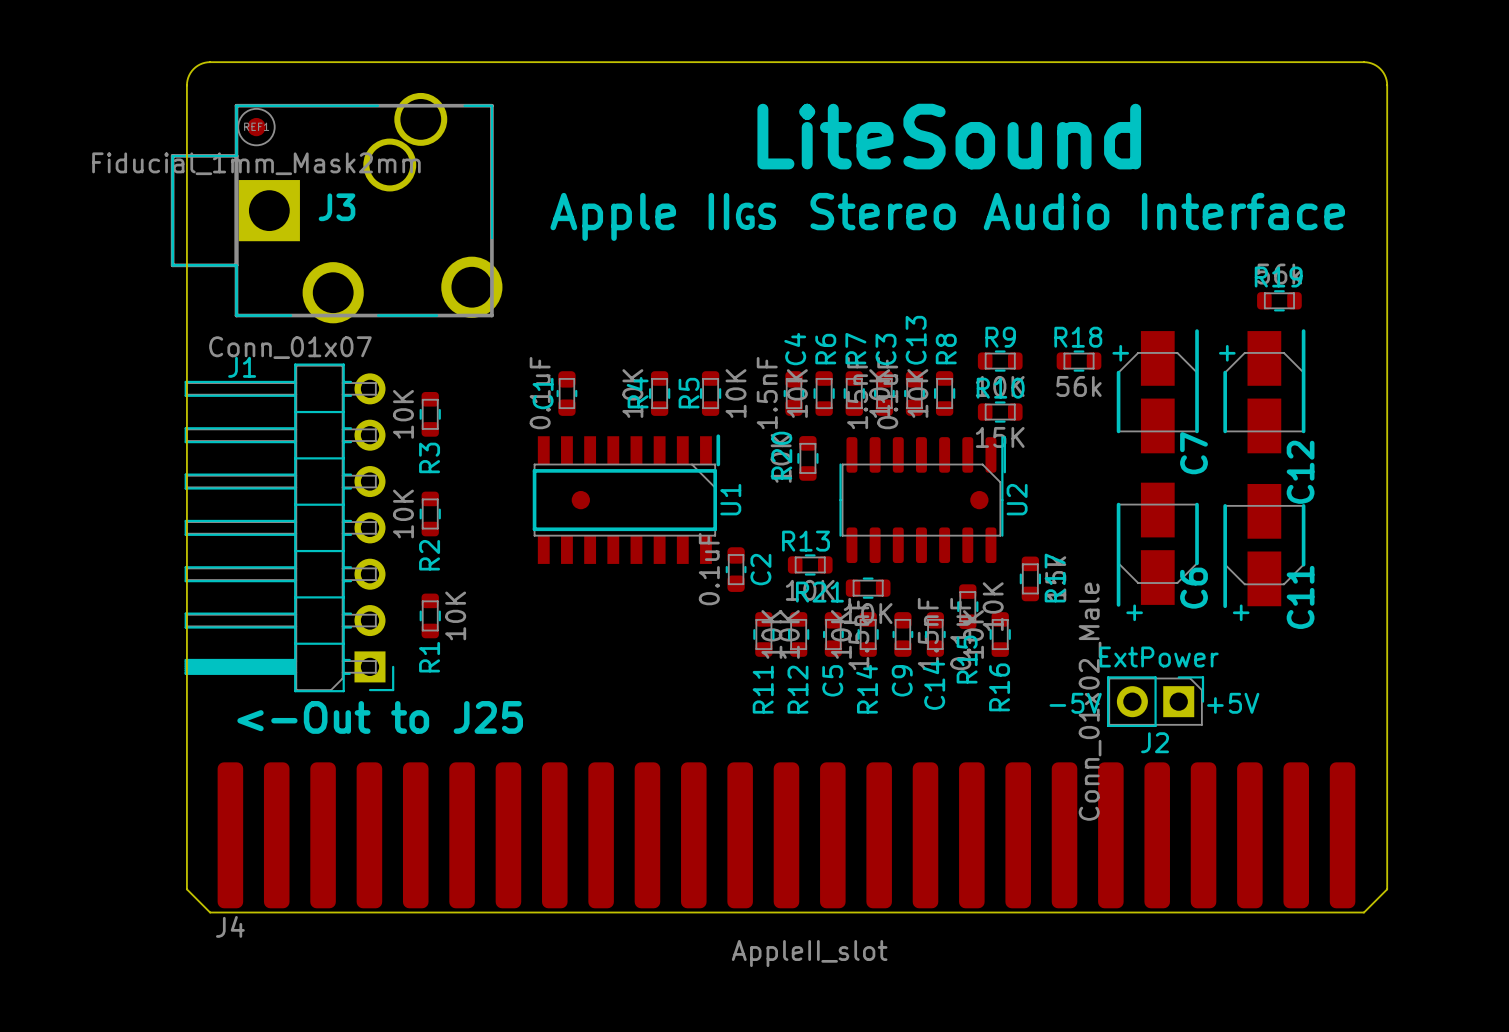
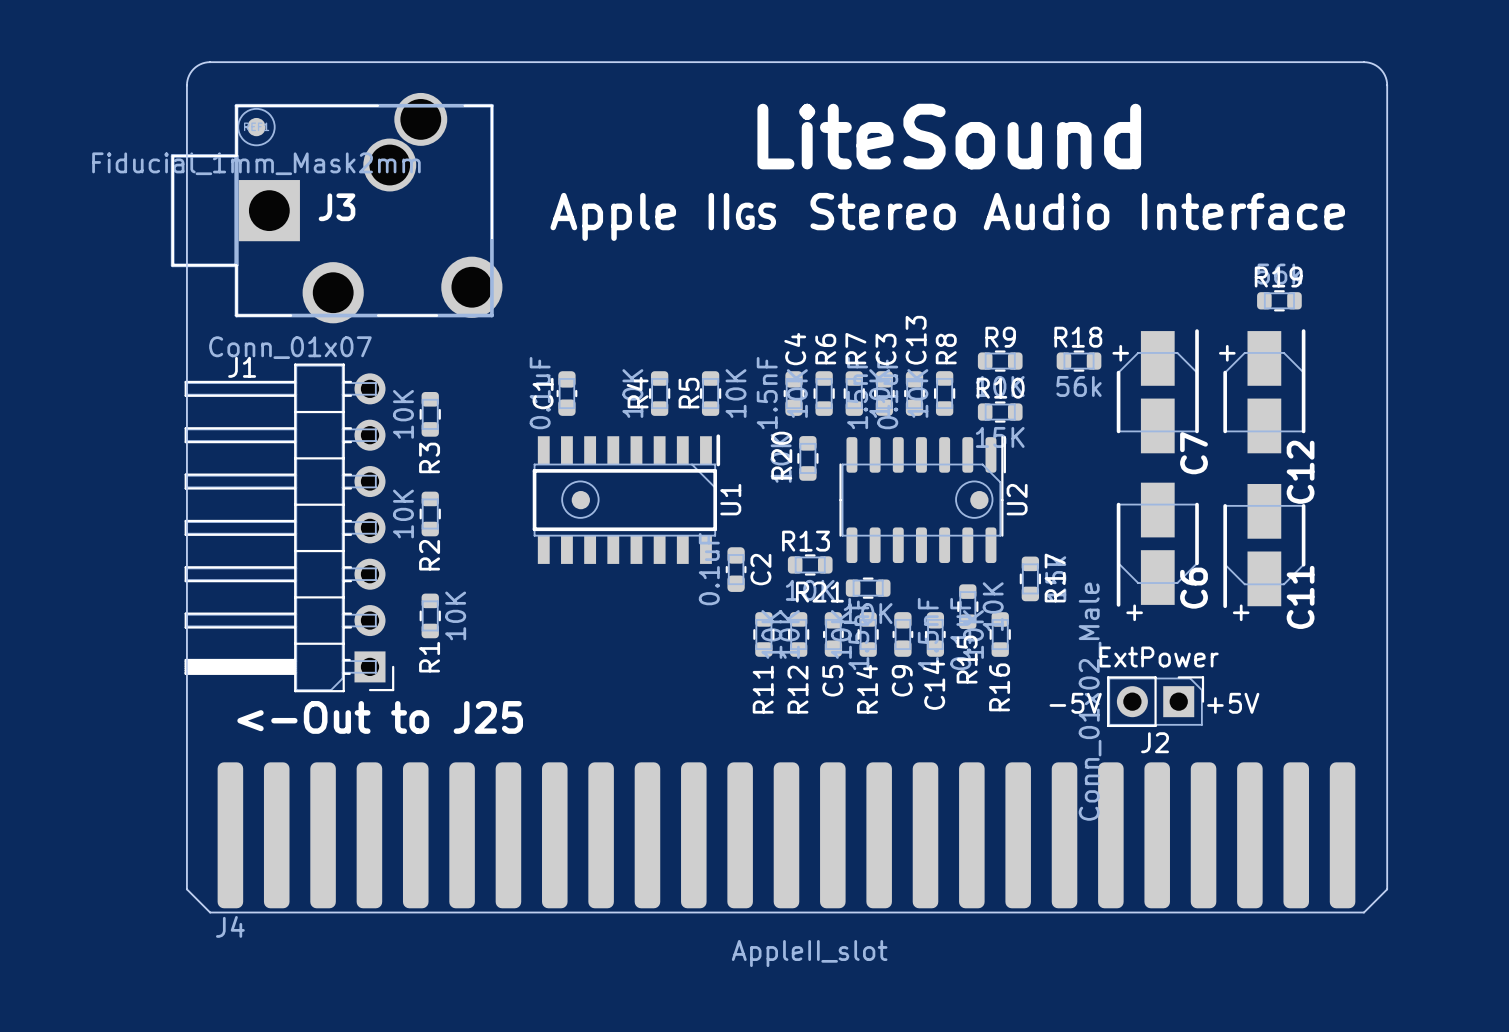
part footprint: [571, 491, 590, 510] -> [561, 480, 600, 519]
part footprint: [970, 491, 989, 510] -> [955, 480, 994, 519]

